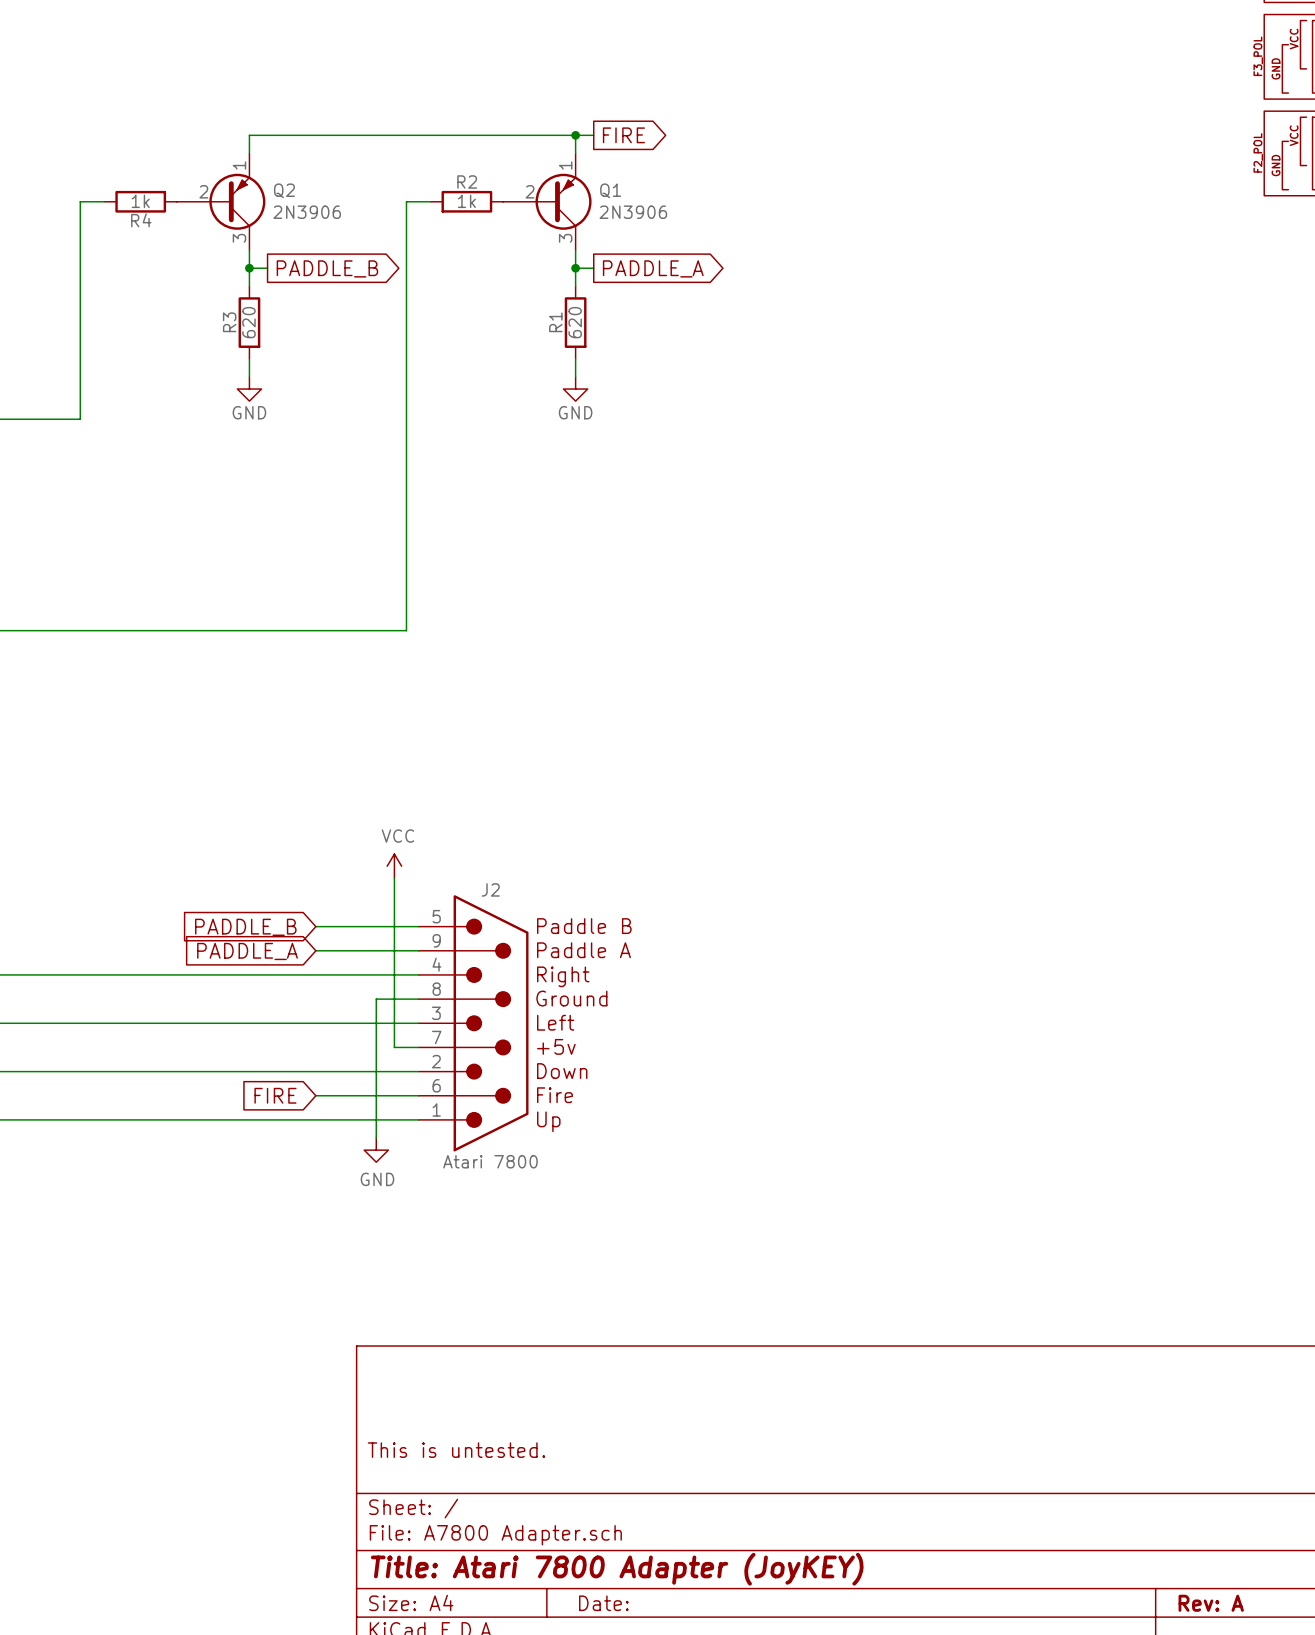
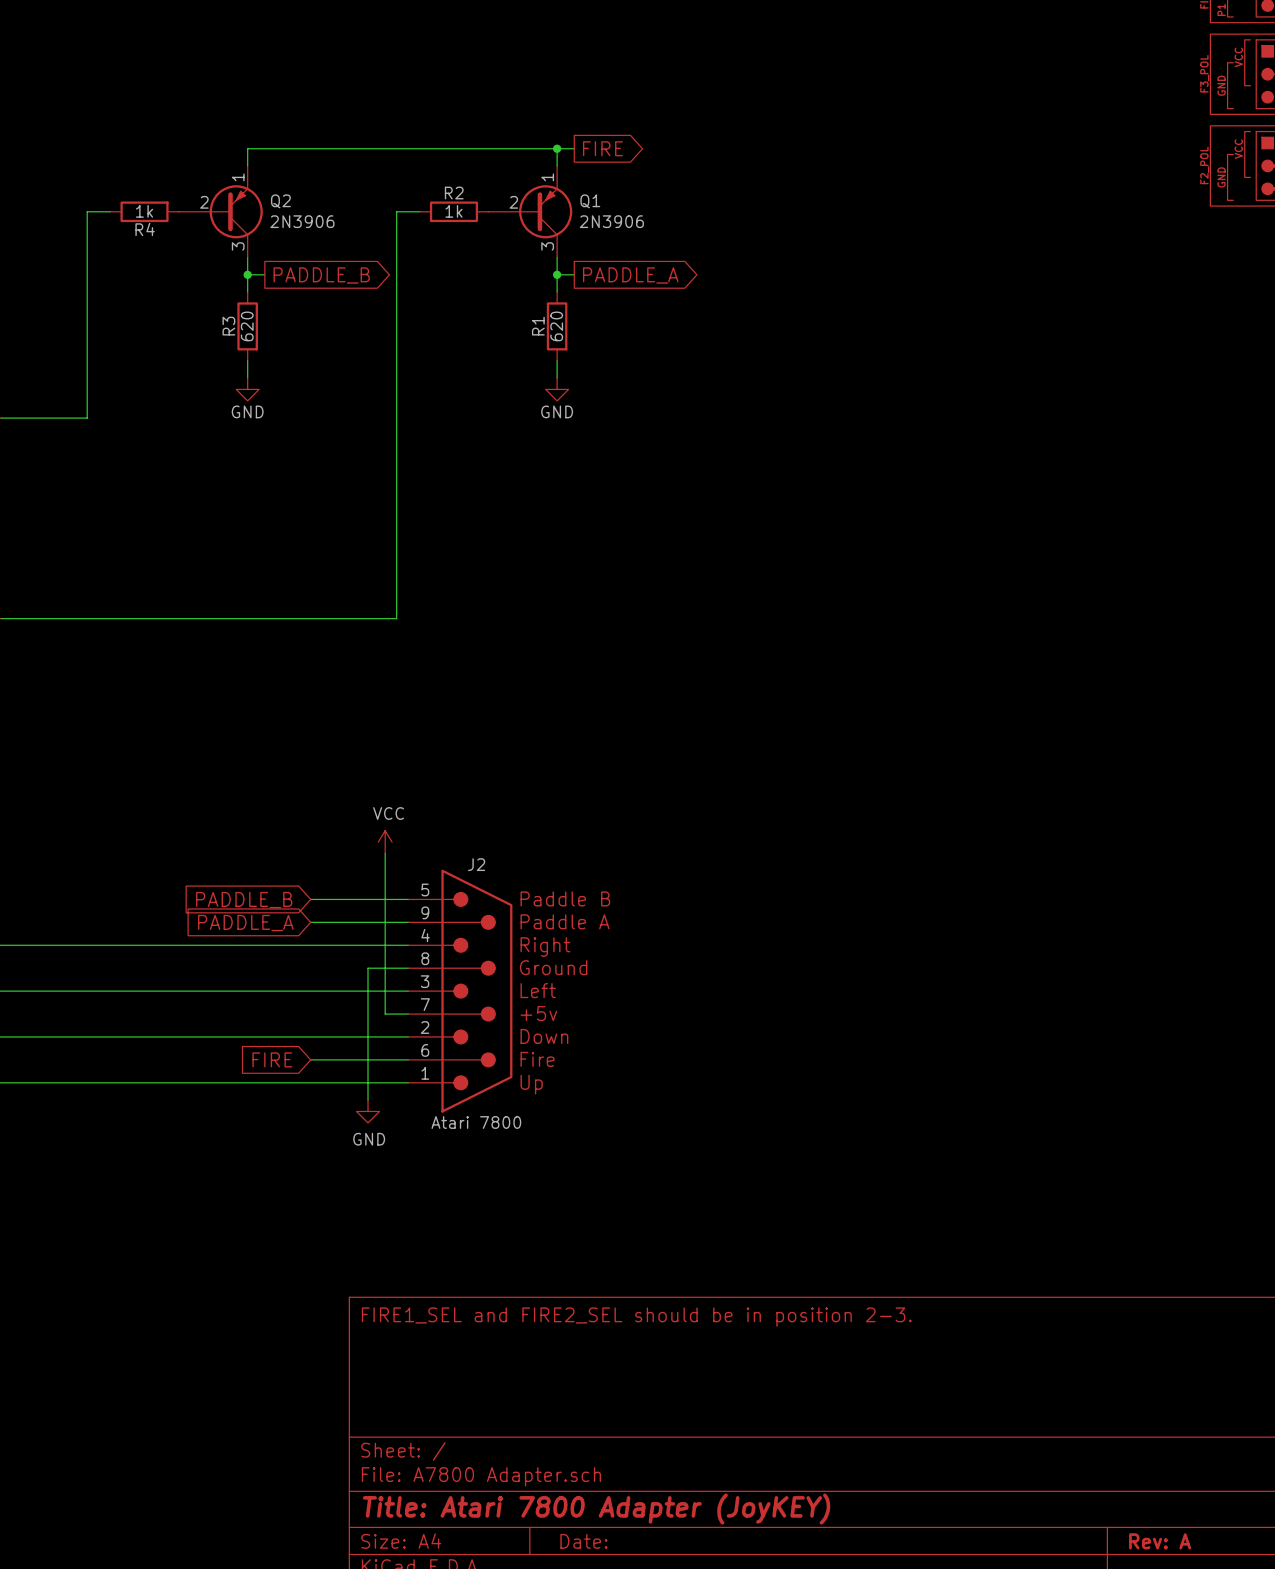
title block: none -> FIRE1_SEL and FIRE2_SEL should be in position 2-3. (636, 1317)
title block: This is untested. (456, 1450) -> none

